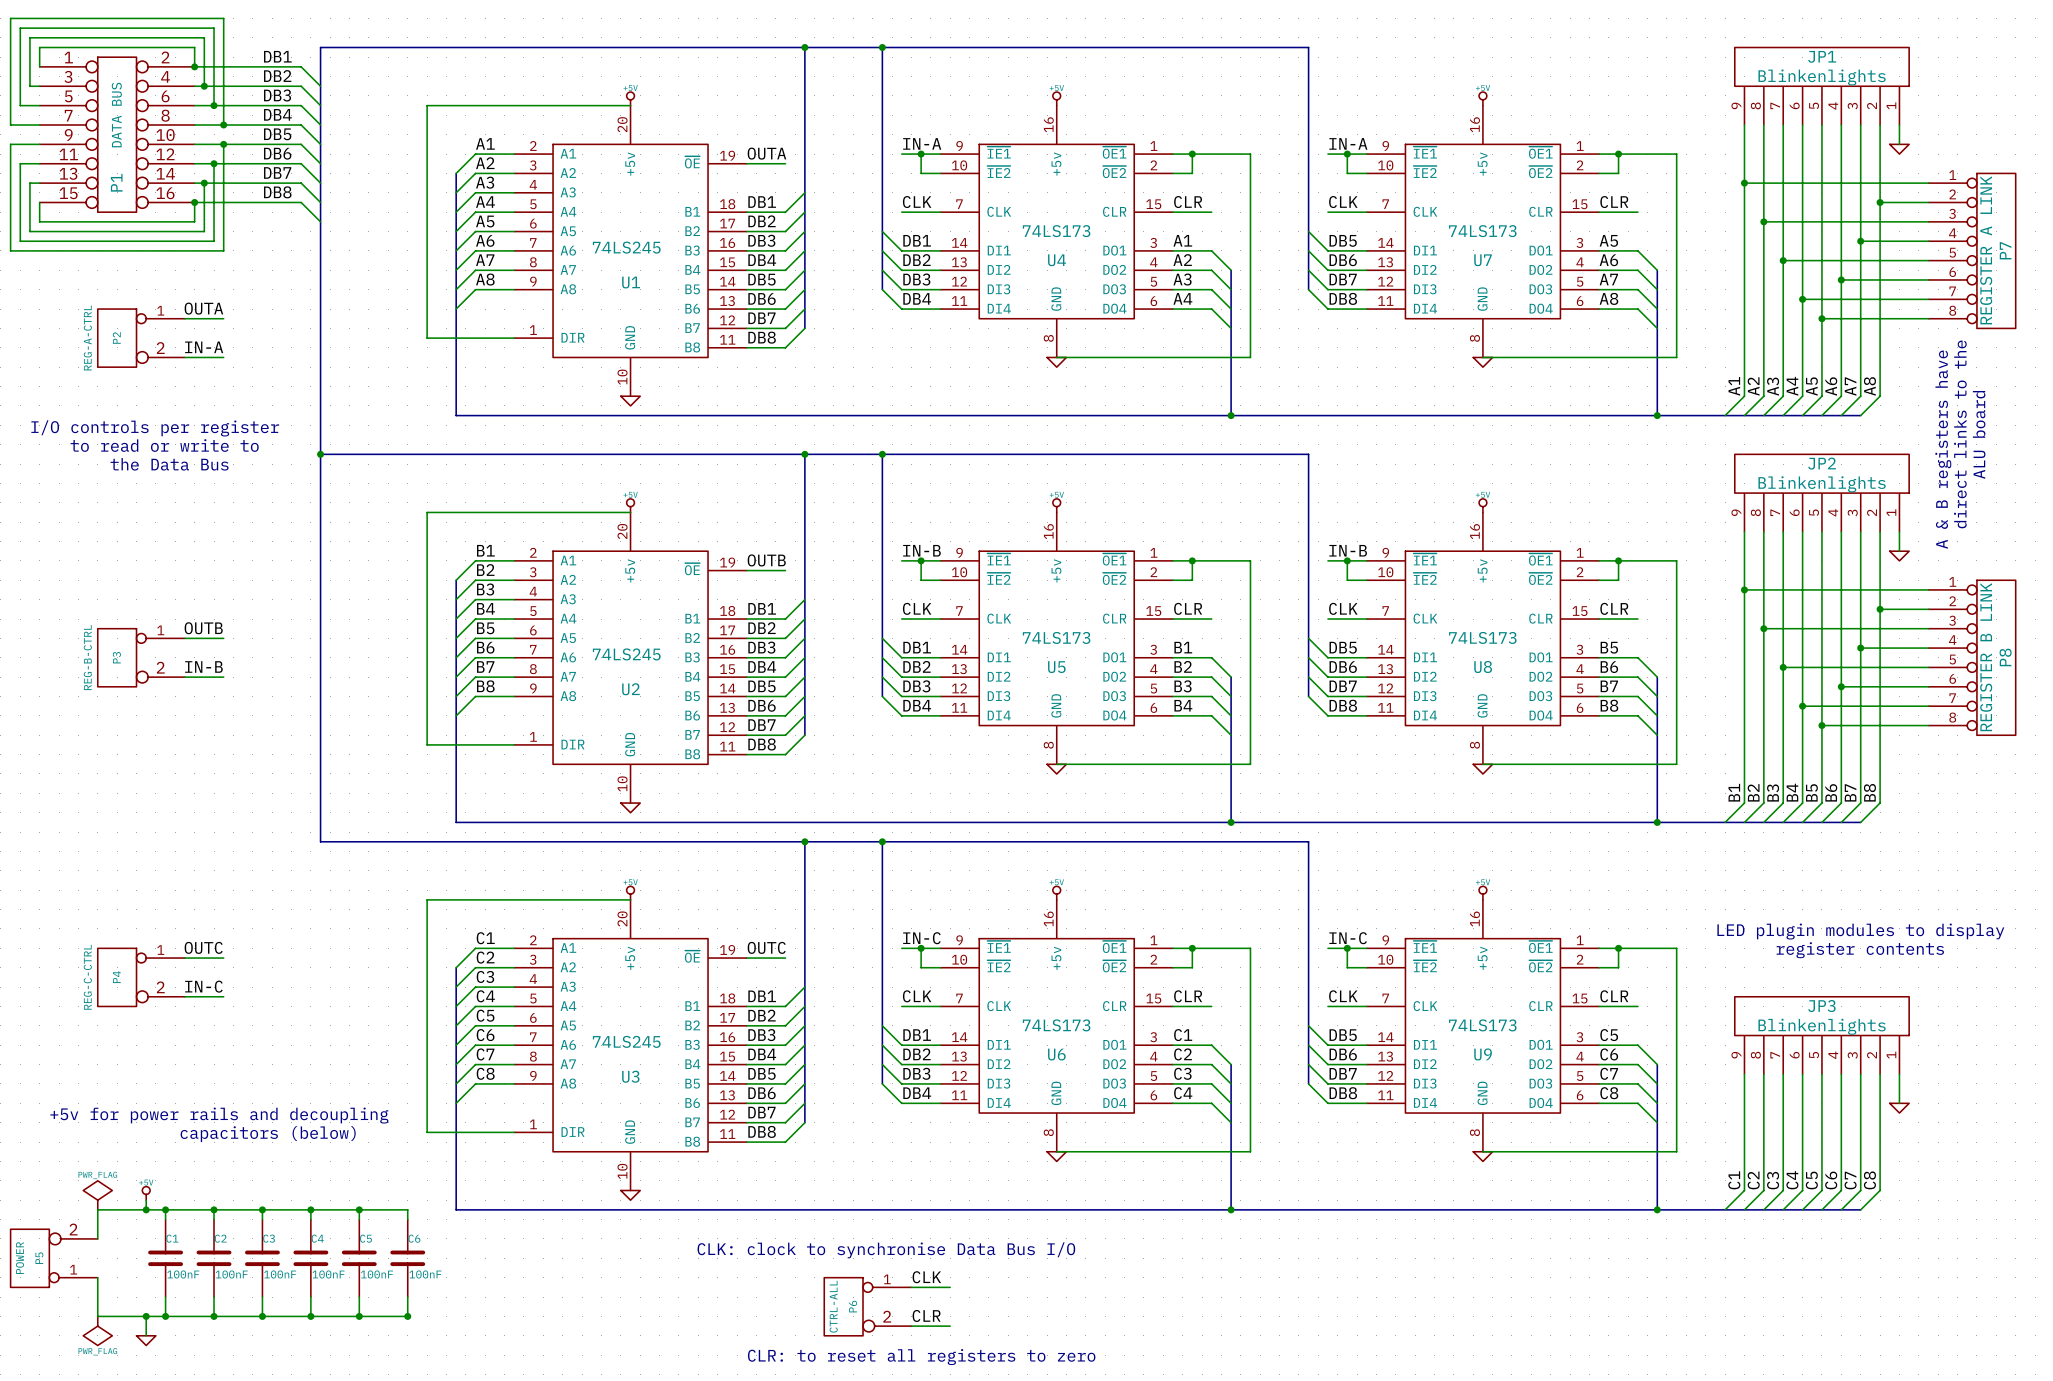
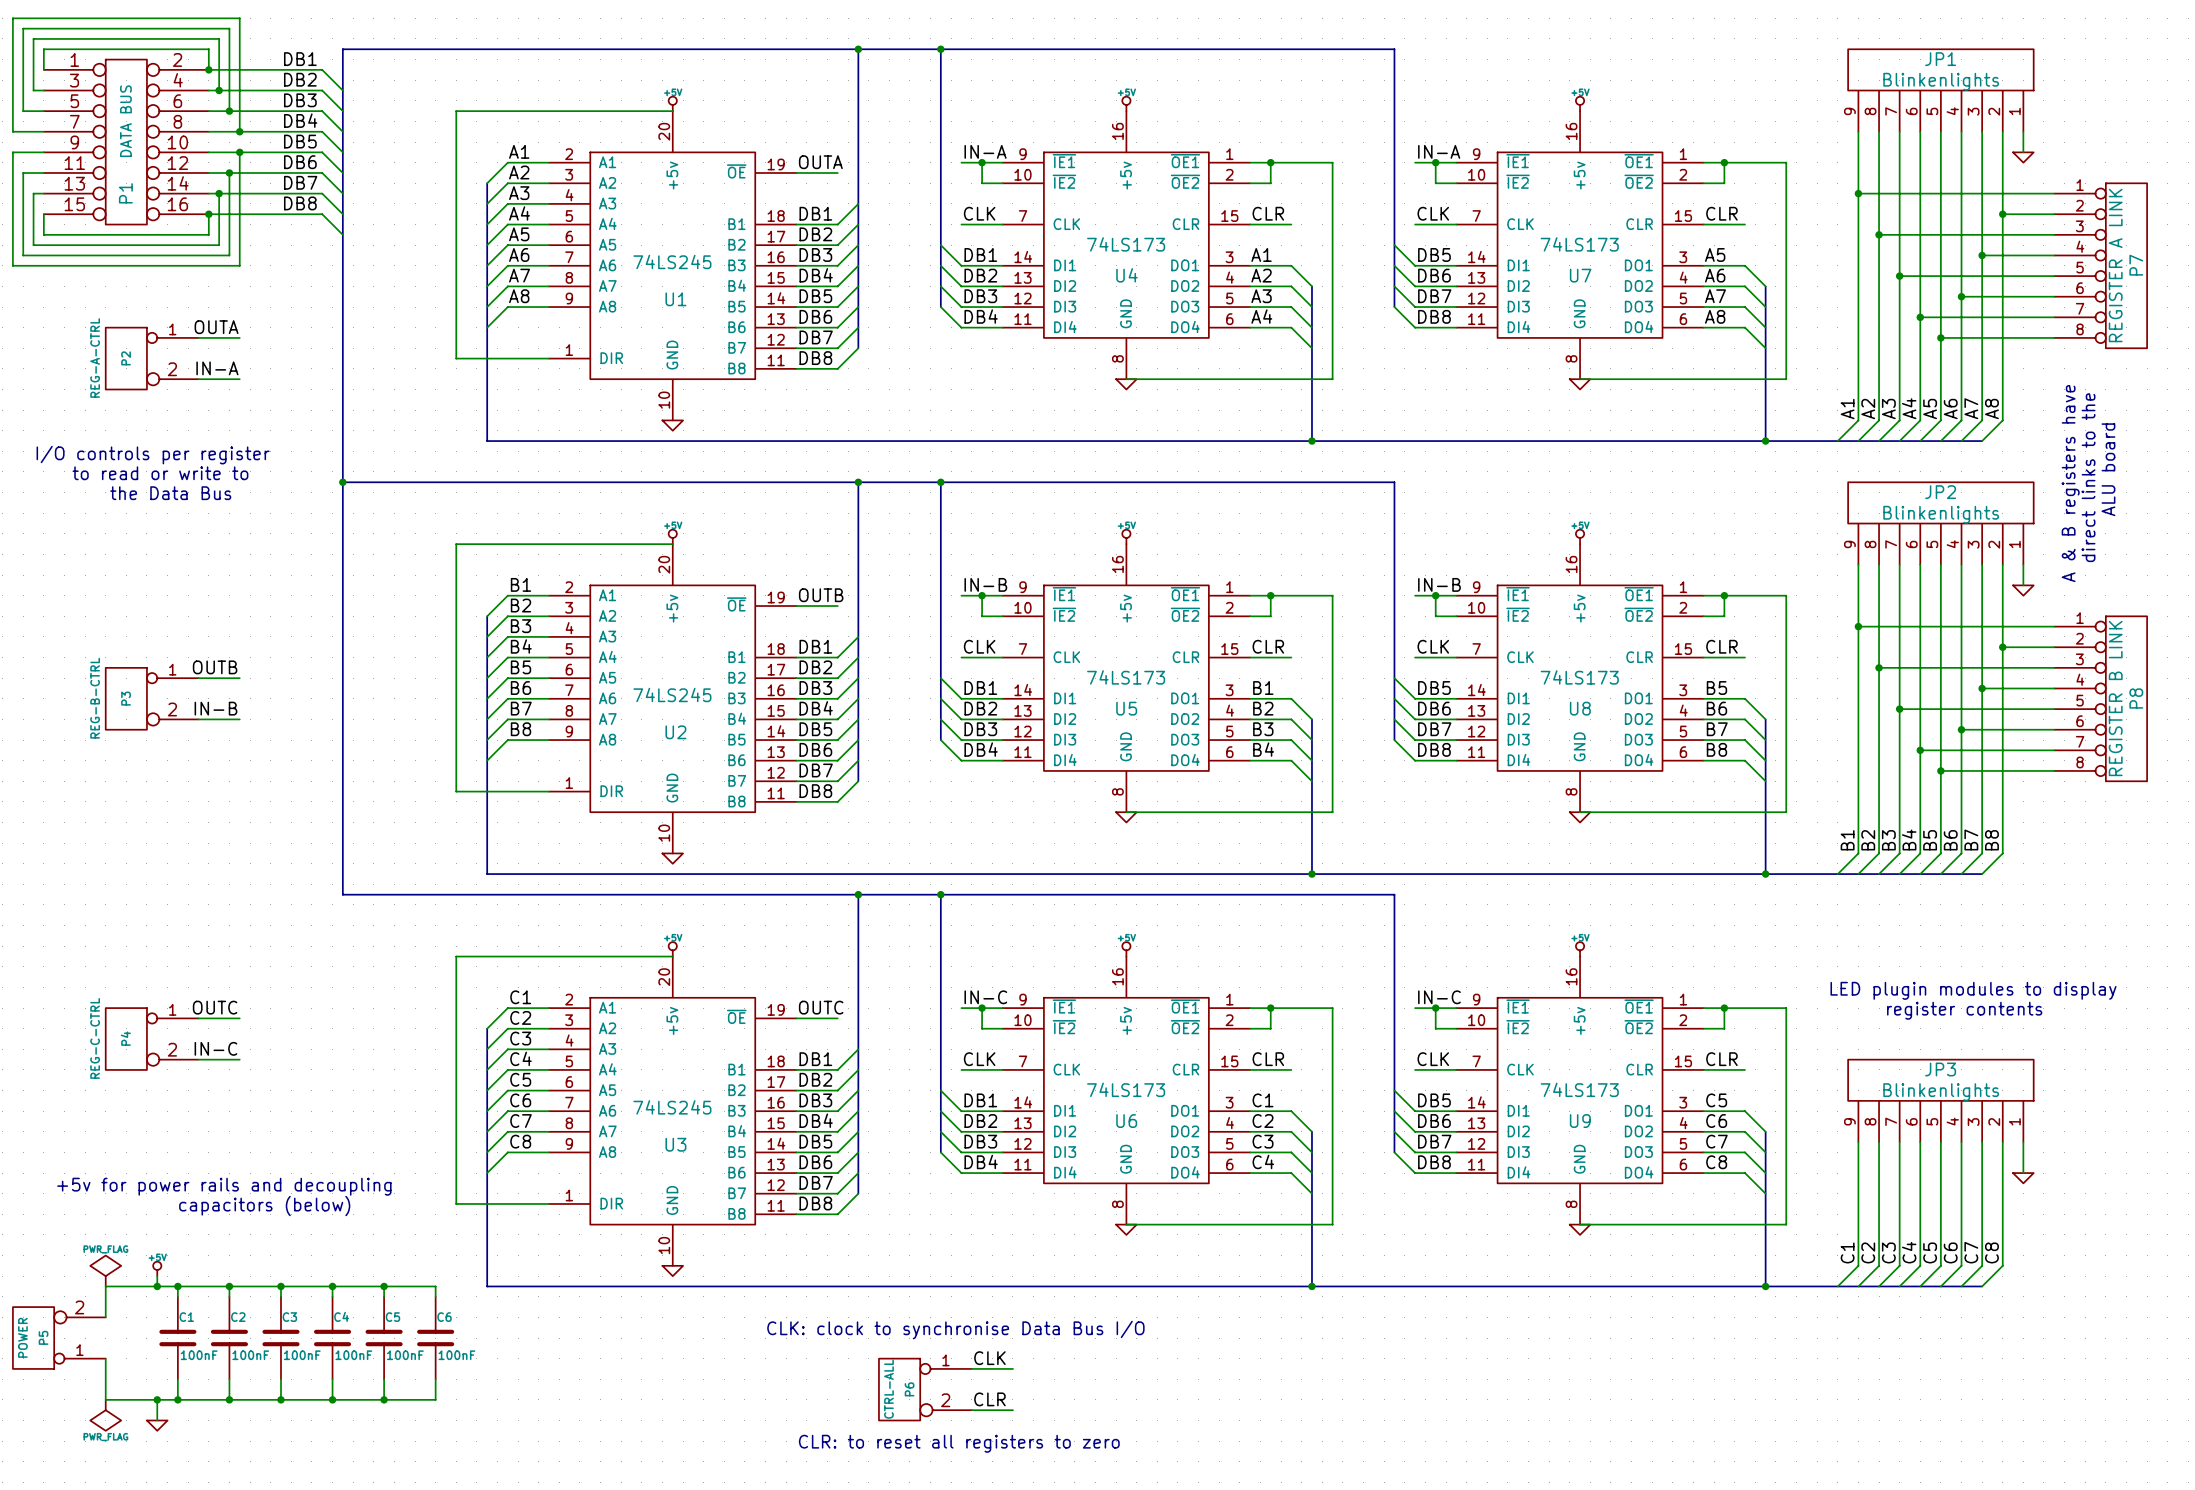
junction: (407, 1316) -> none

